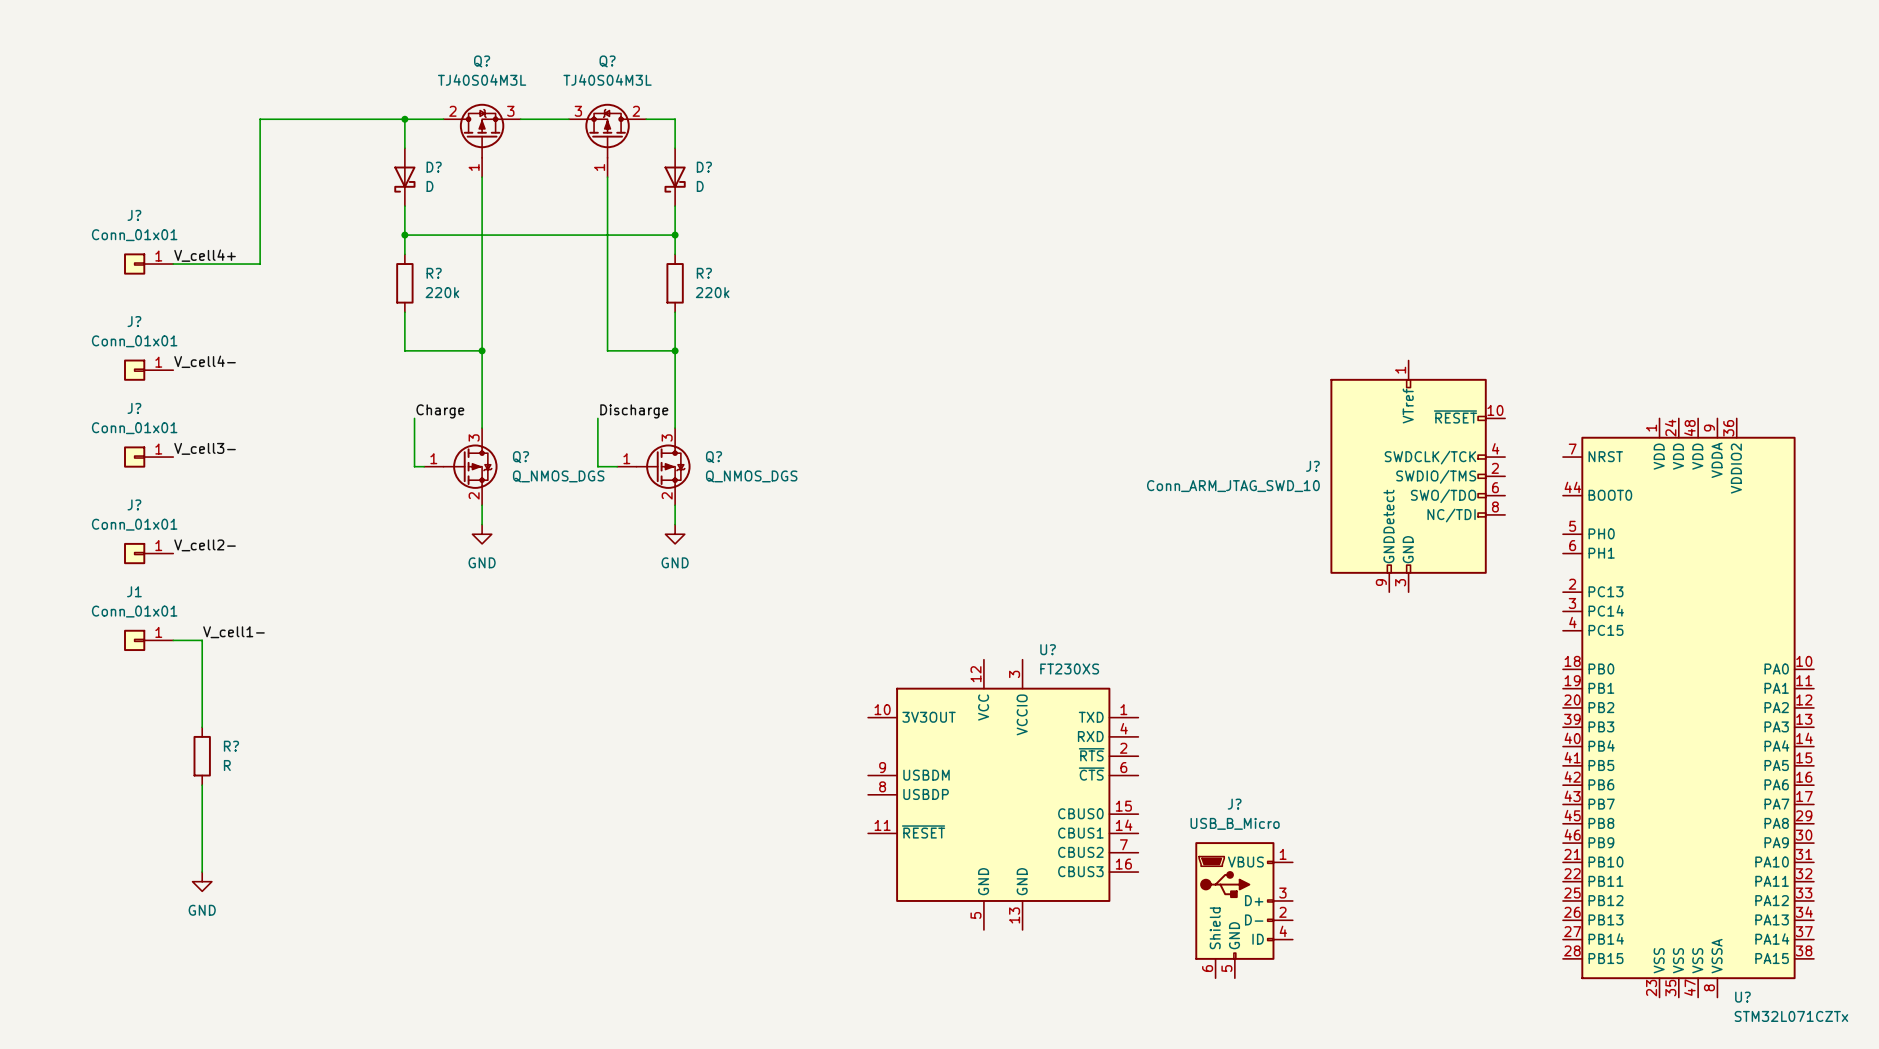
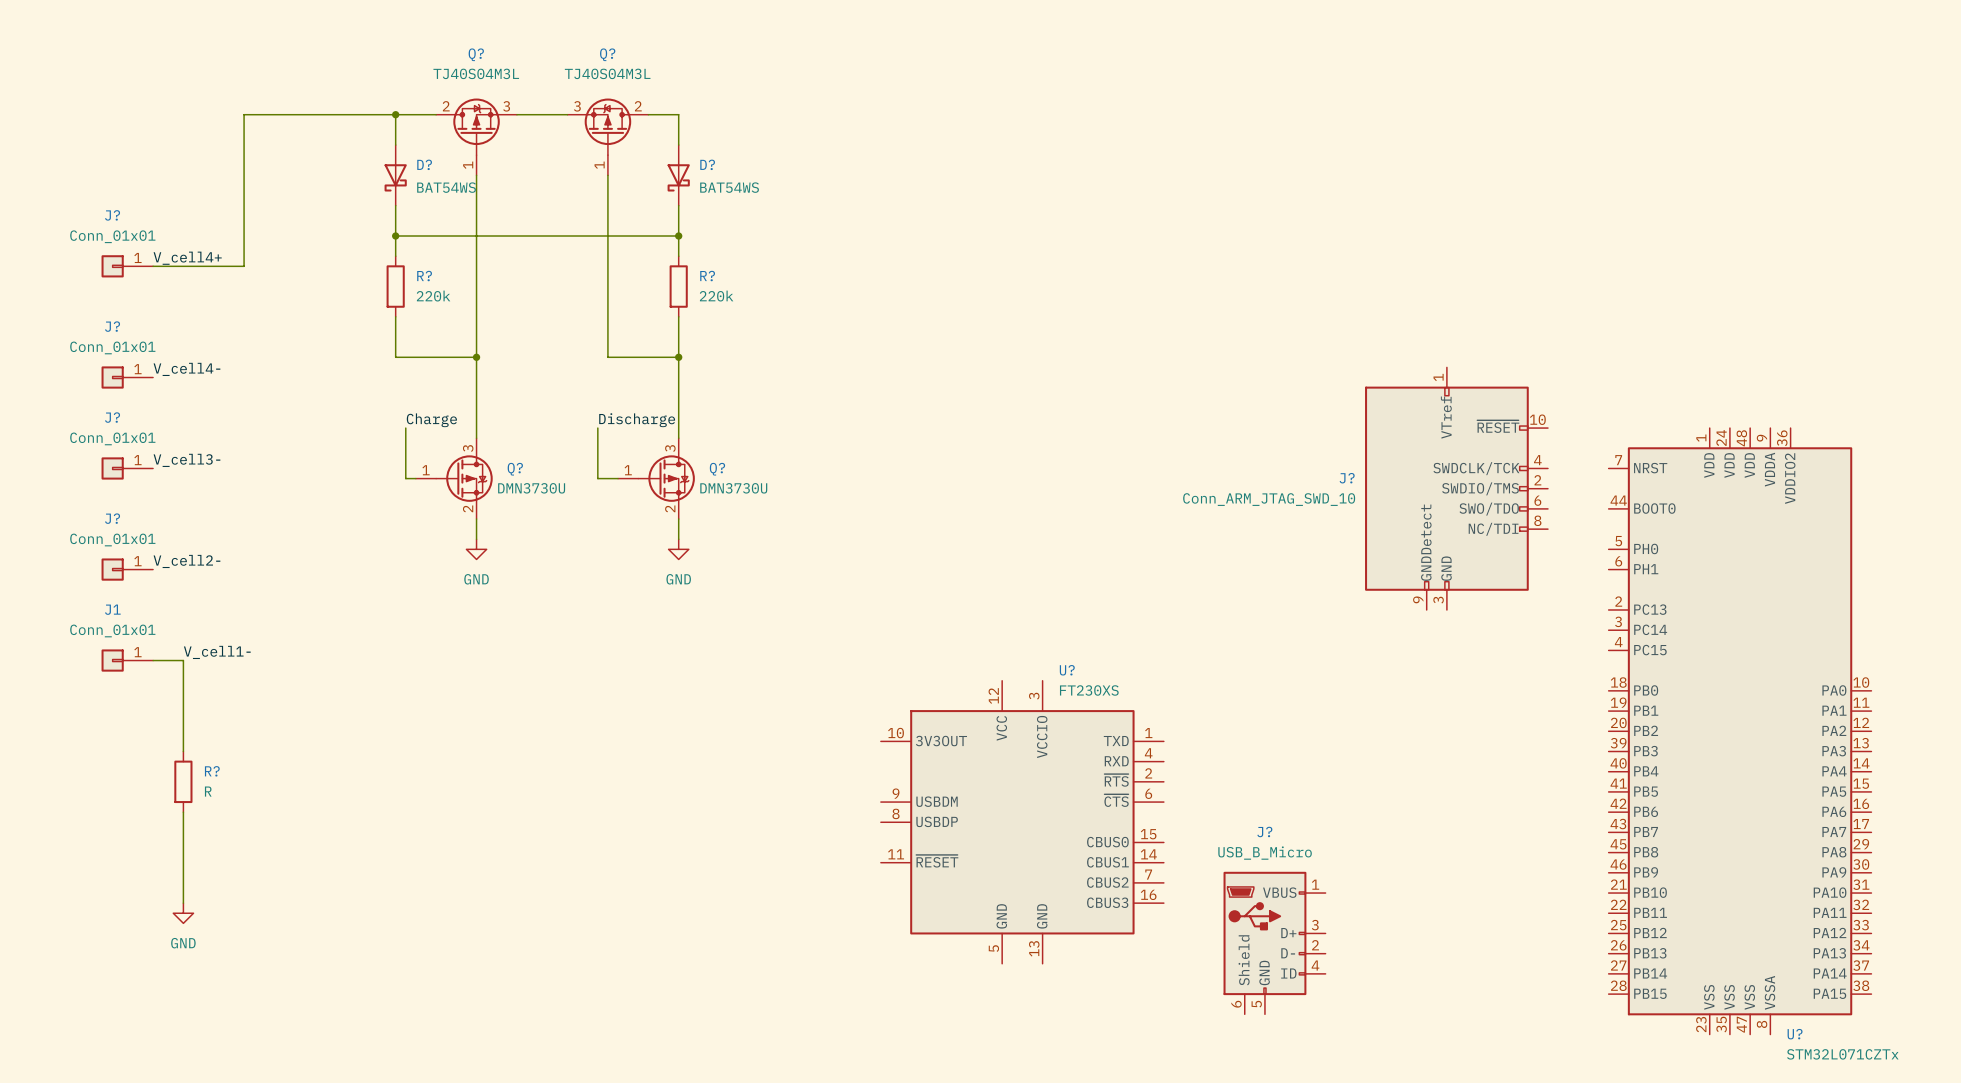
D? value: D (430, 186) -> BAT54WS (446, 187)
D? value: D (700, 186) -> BAT54WS (729, 187)
Q? value: Q_NMOS_DGS (558, 476) -> DMN3730U (531, 488)
Q? value: Q_NMOS_DGS (751, 476) -> DMN3730U (733, 488)

